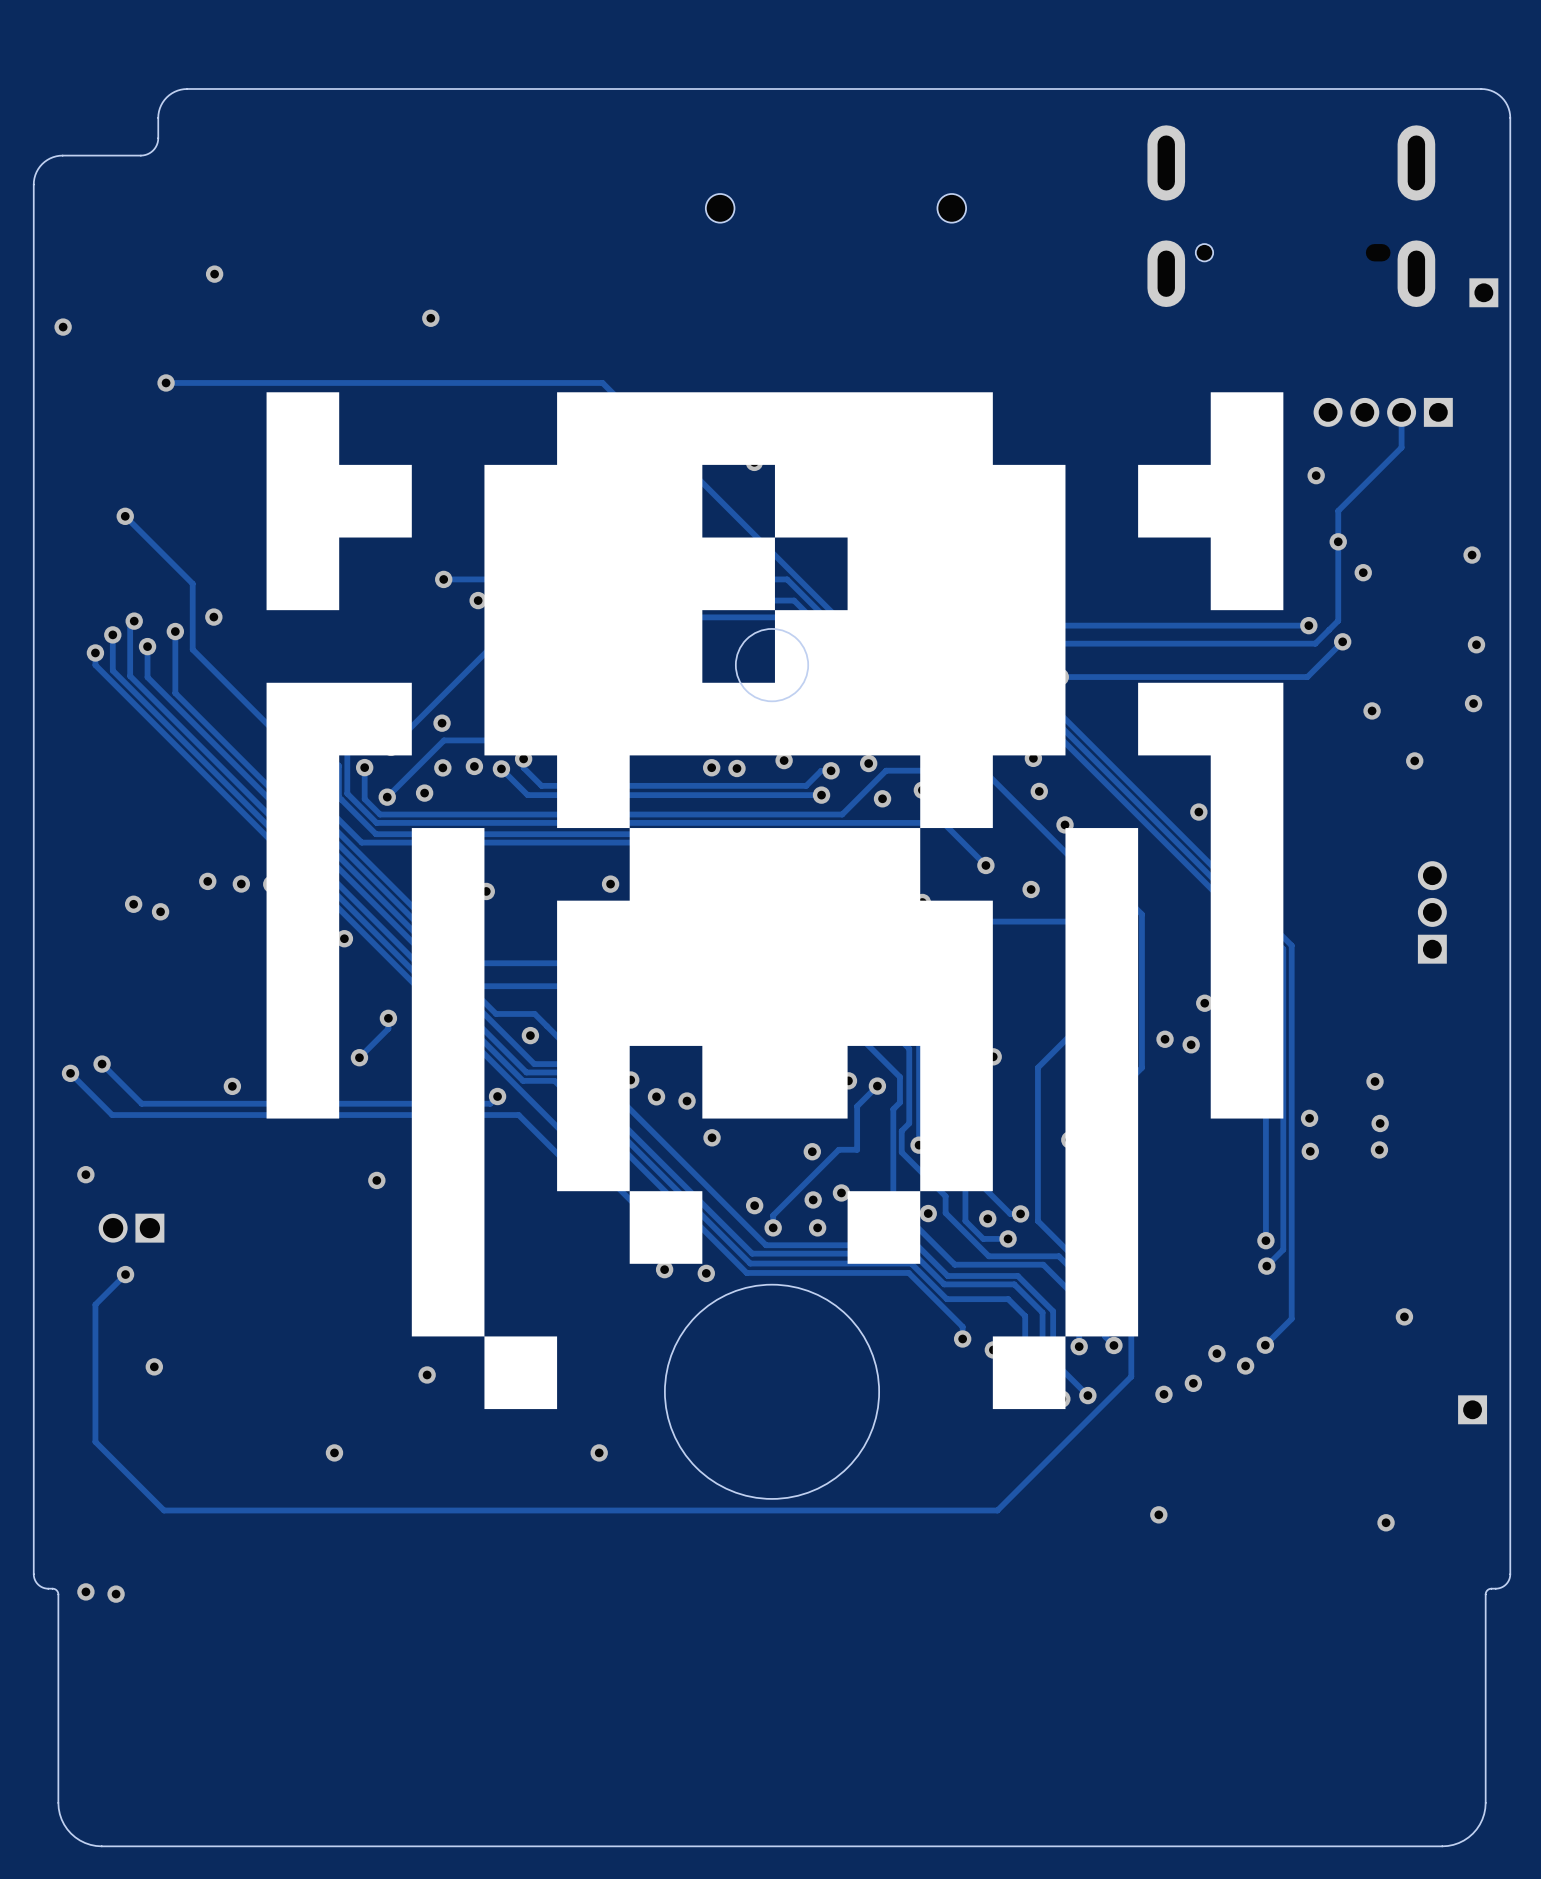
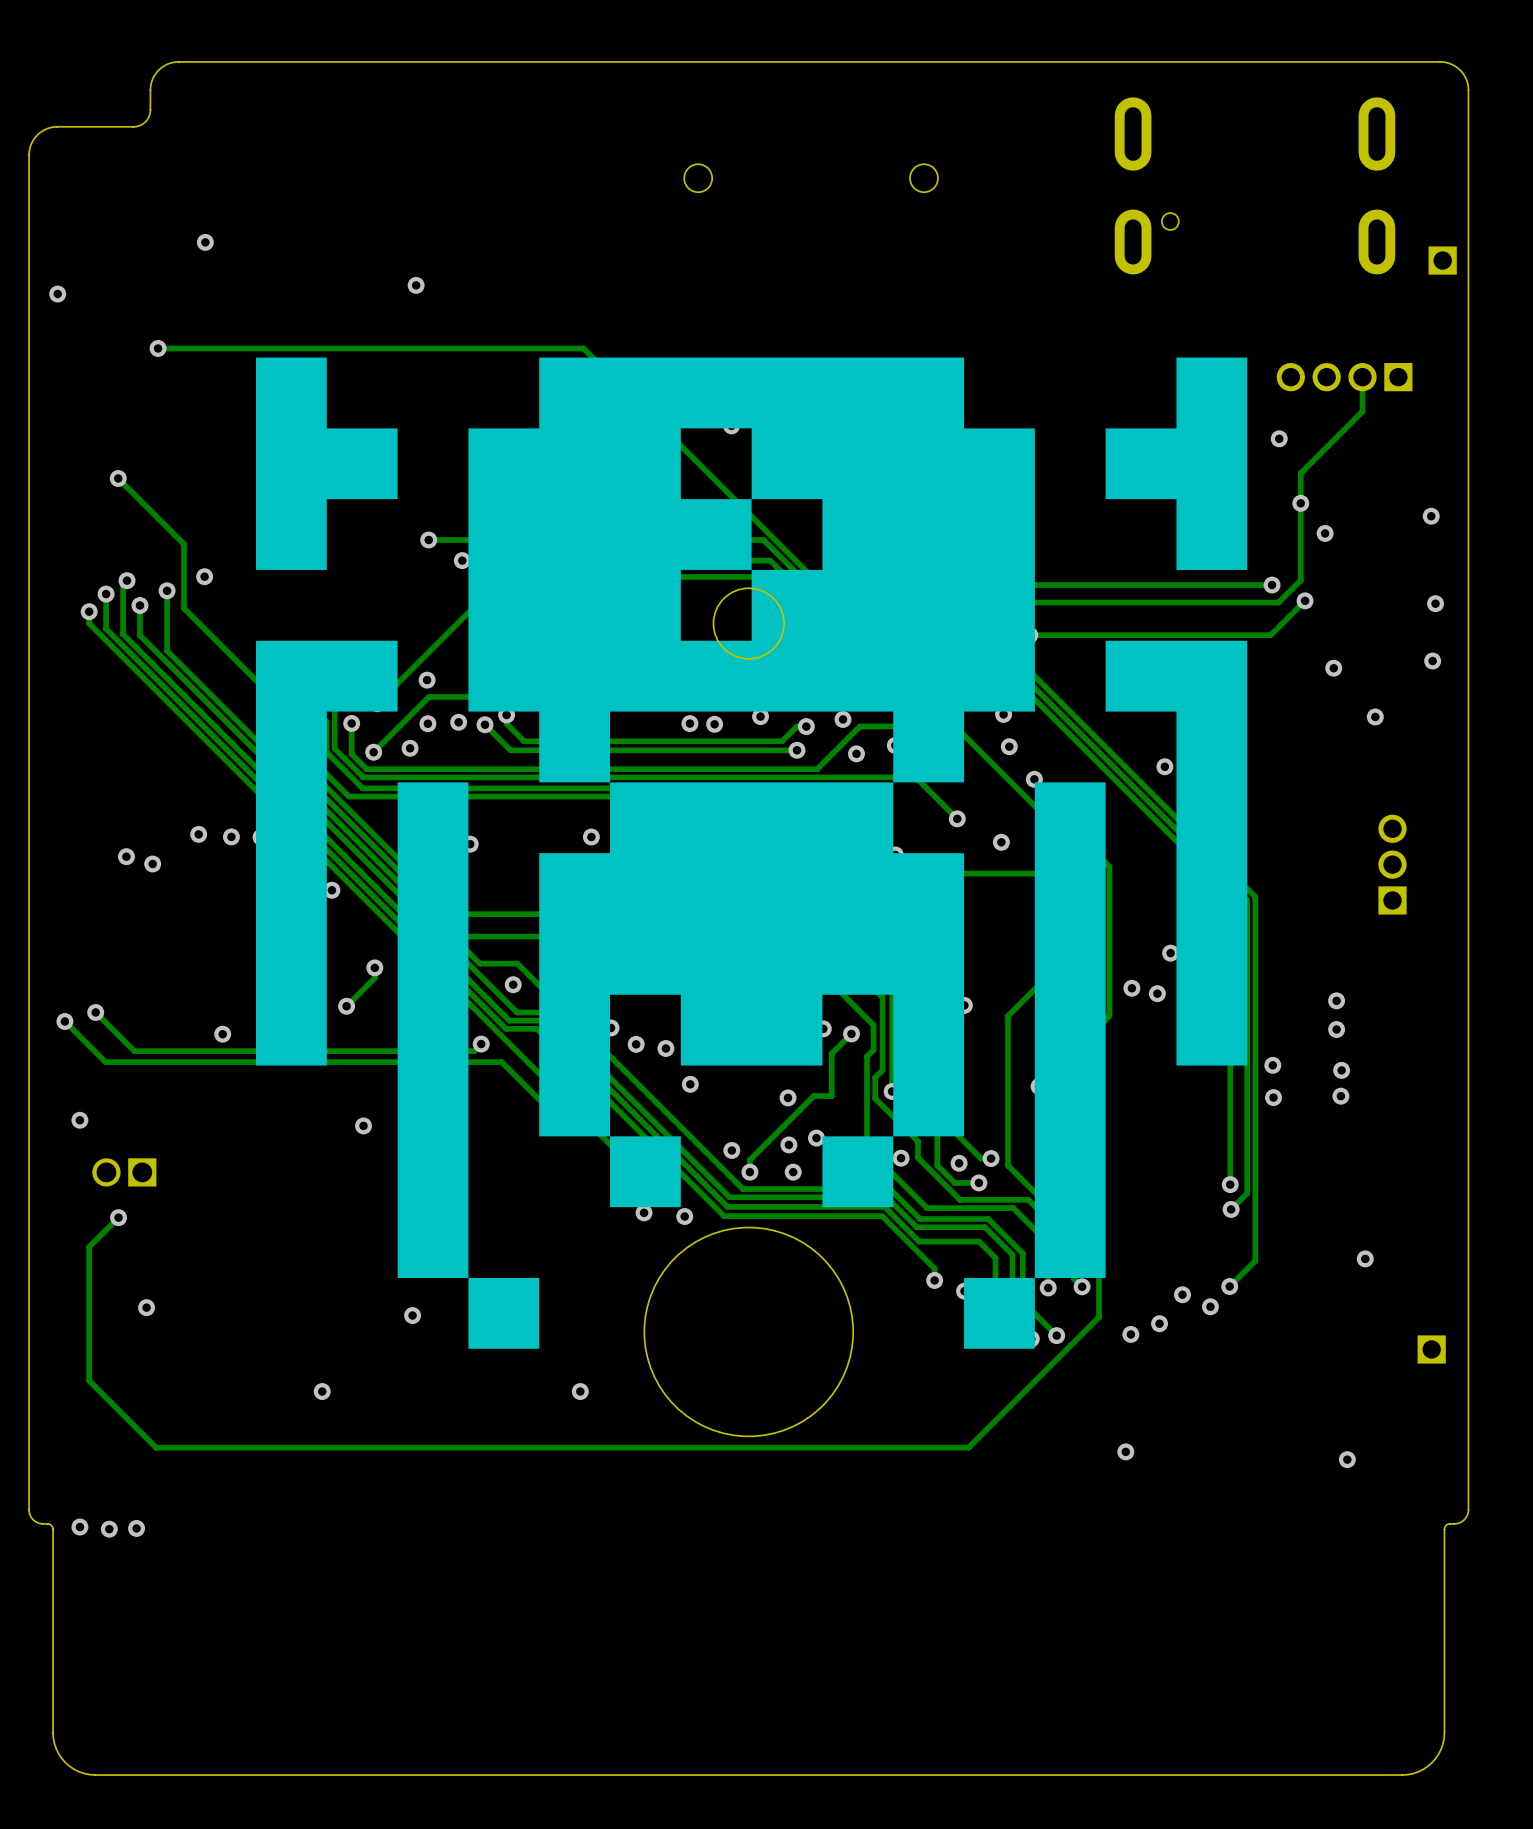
via: none -> (1336, 1000)
via: none -> (136, 1528)

